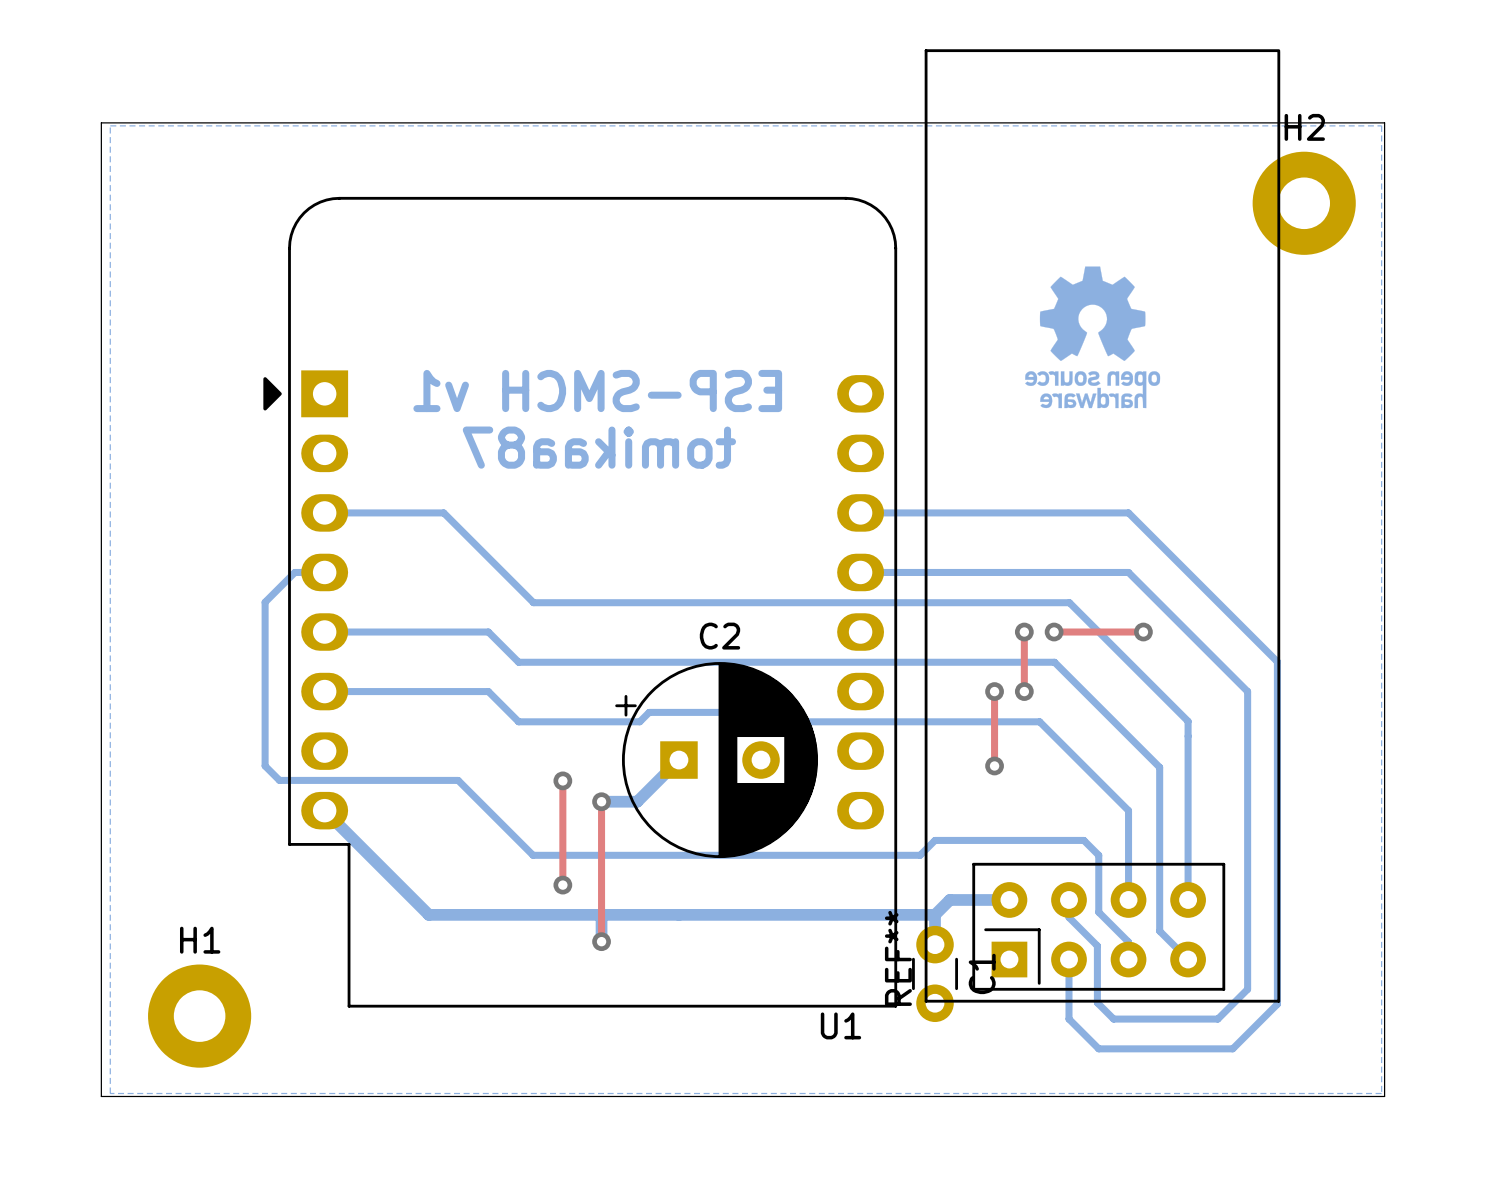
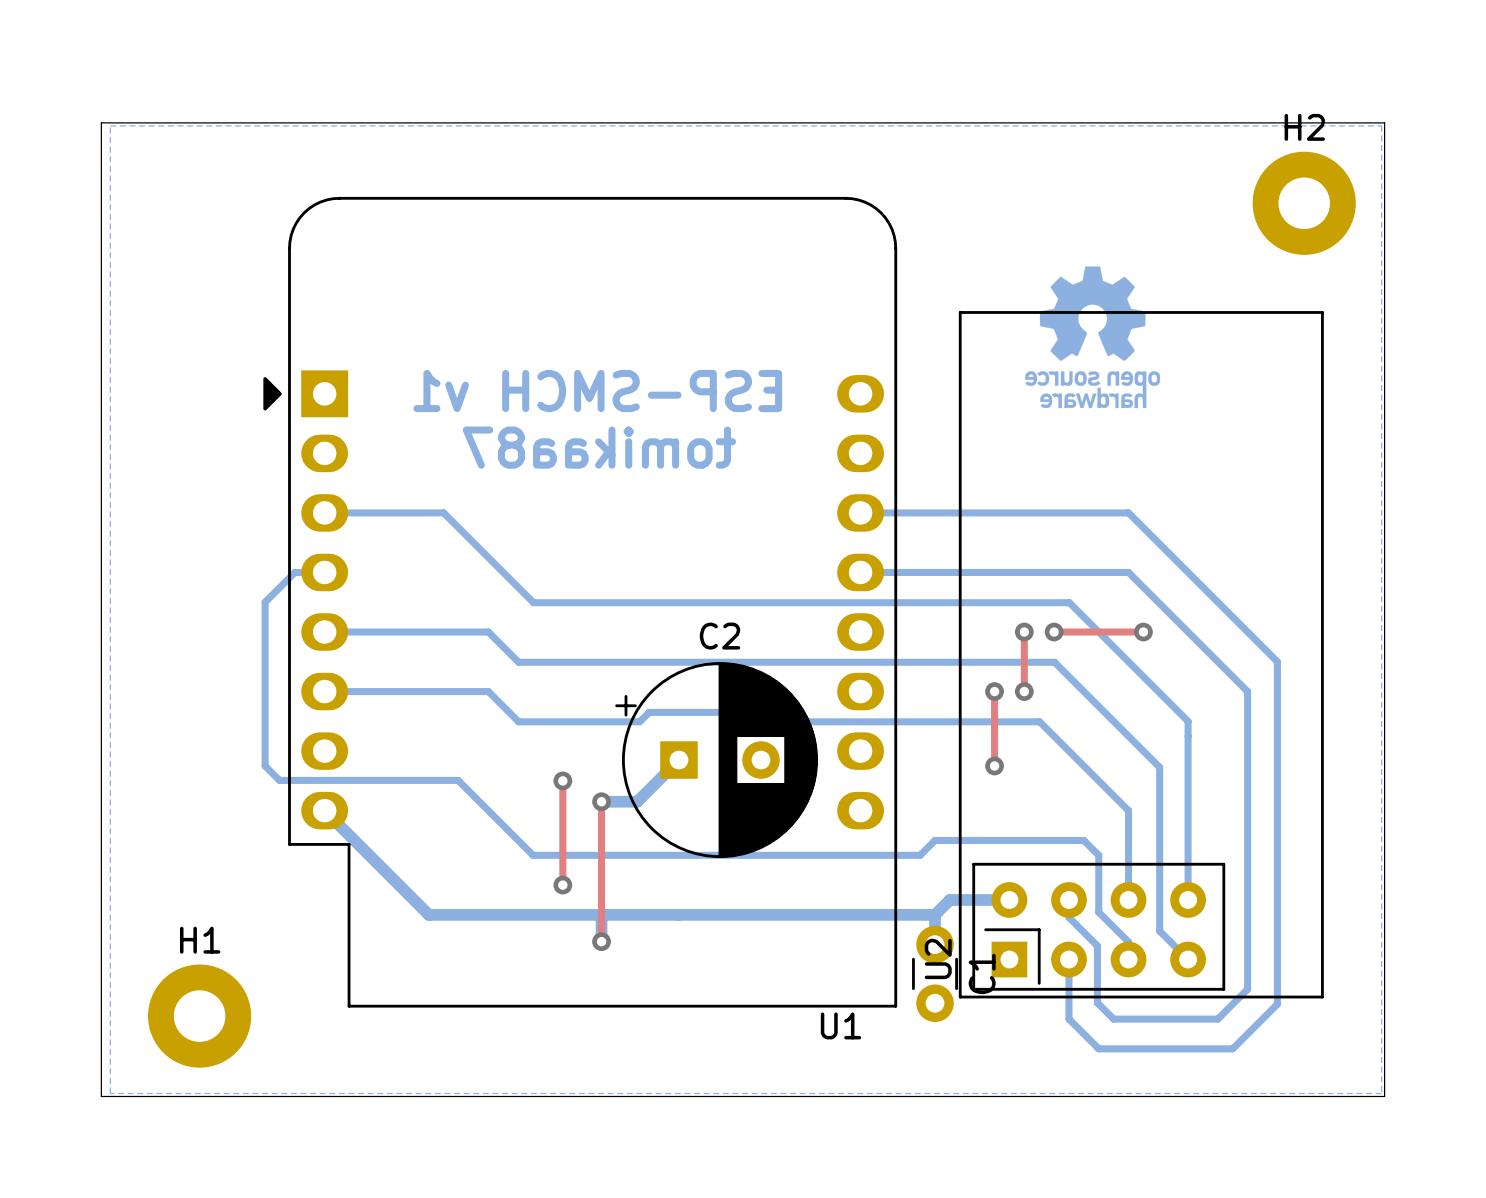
part: (1102, 525) -> none
U2: none -> (1141, 654)

